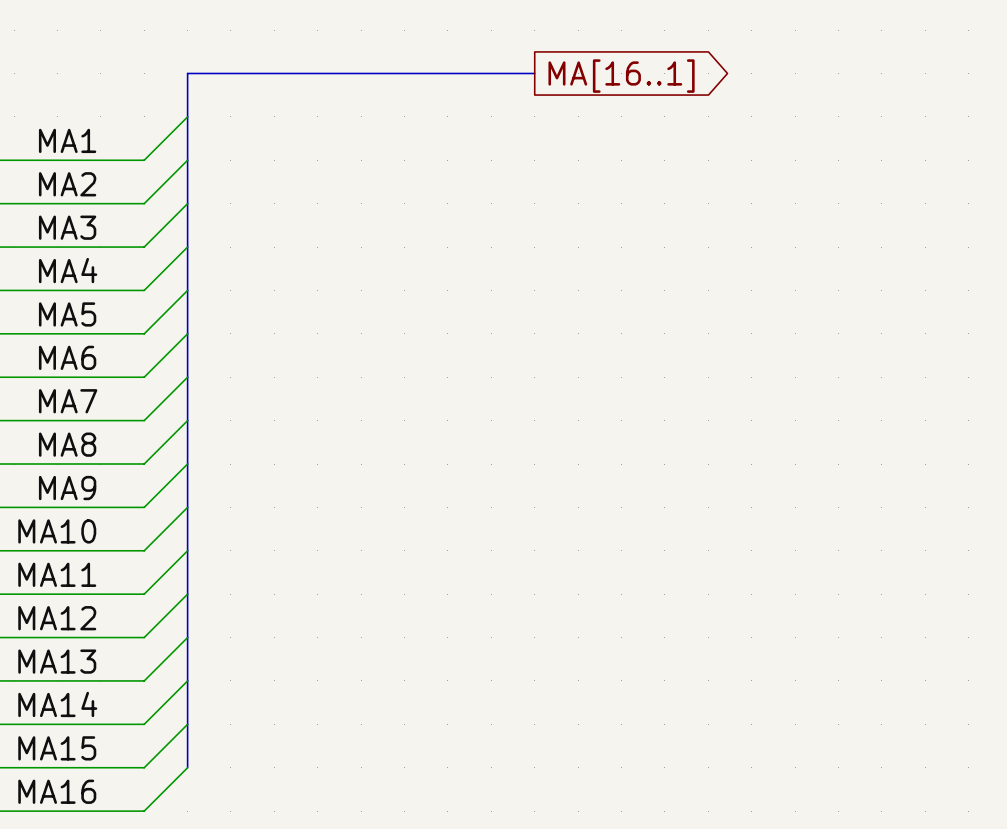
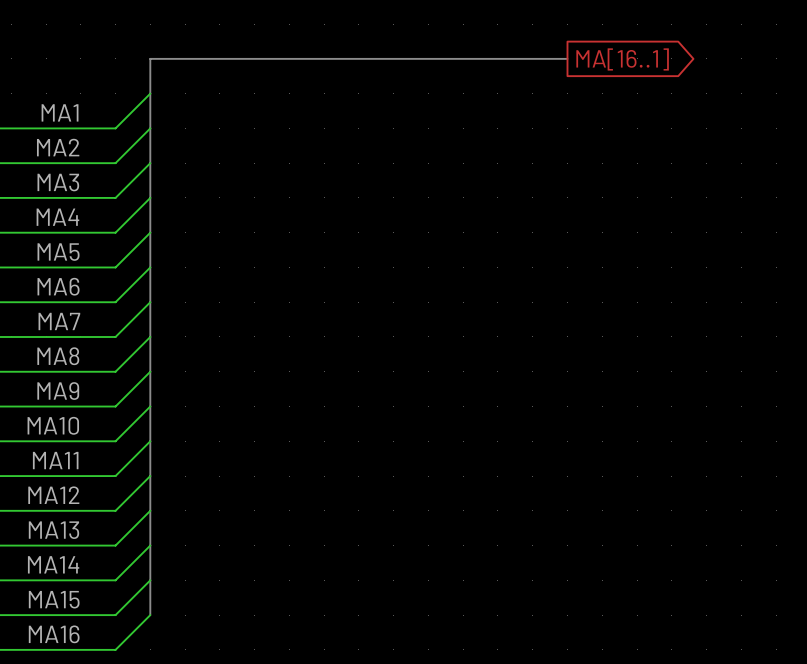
bus: none -> (428, 58) (567, 58)
global label position: MA[16..1] (621, 76) -> MA[16..1] (622, 59)

